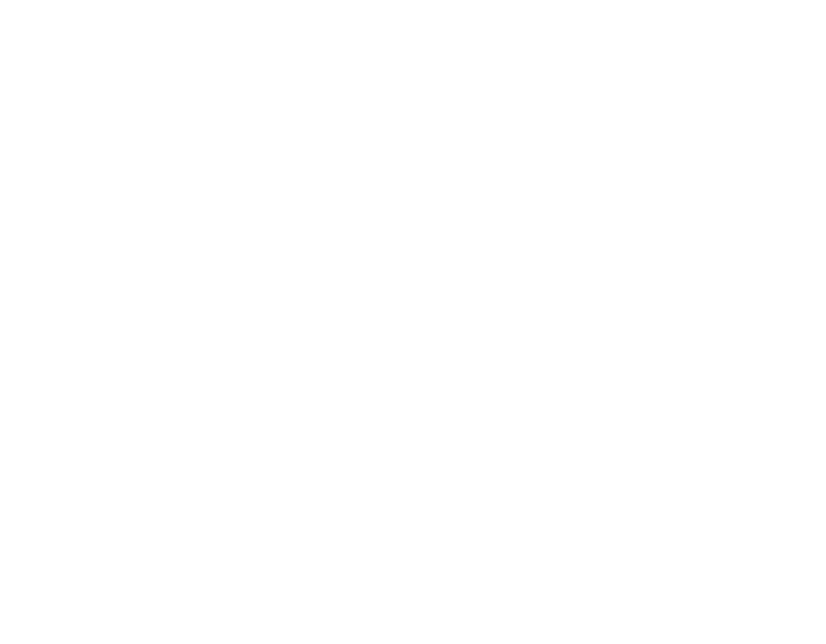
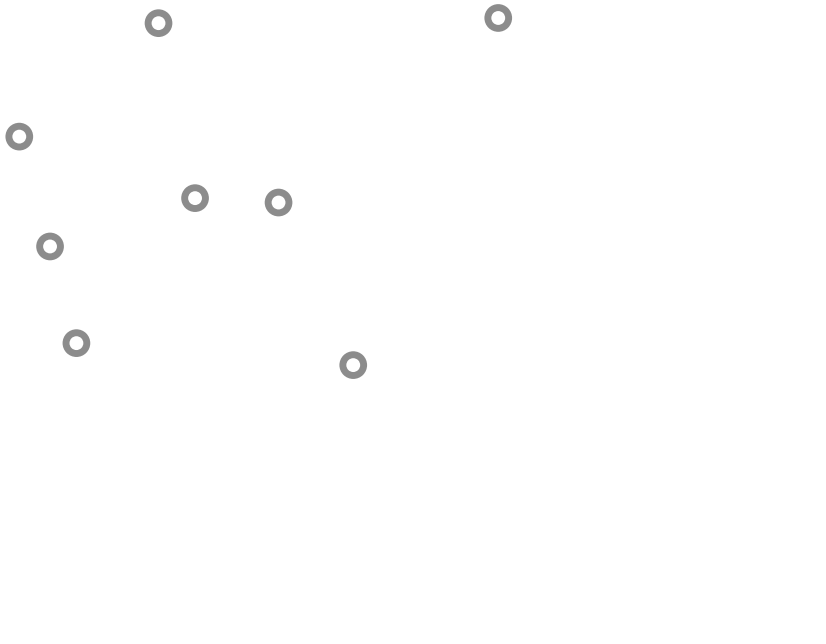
via: none -> (498, 17)
via: none -> (158, 23)
via: none -> (19, 136)
via: none -> (195, 198)
via: none -> (278, 202)
via: none -> (50, 246)
via: none -> (76, 343)
via: none -> (353, 365)

